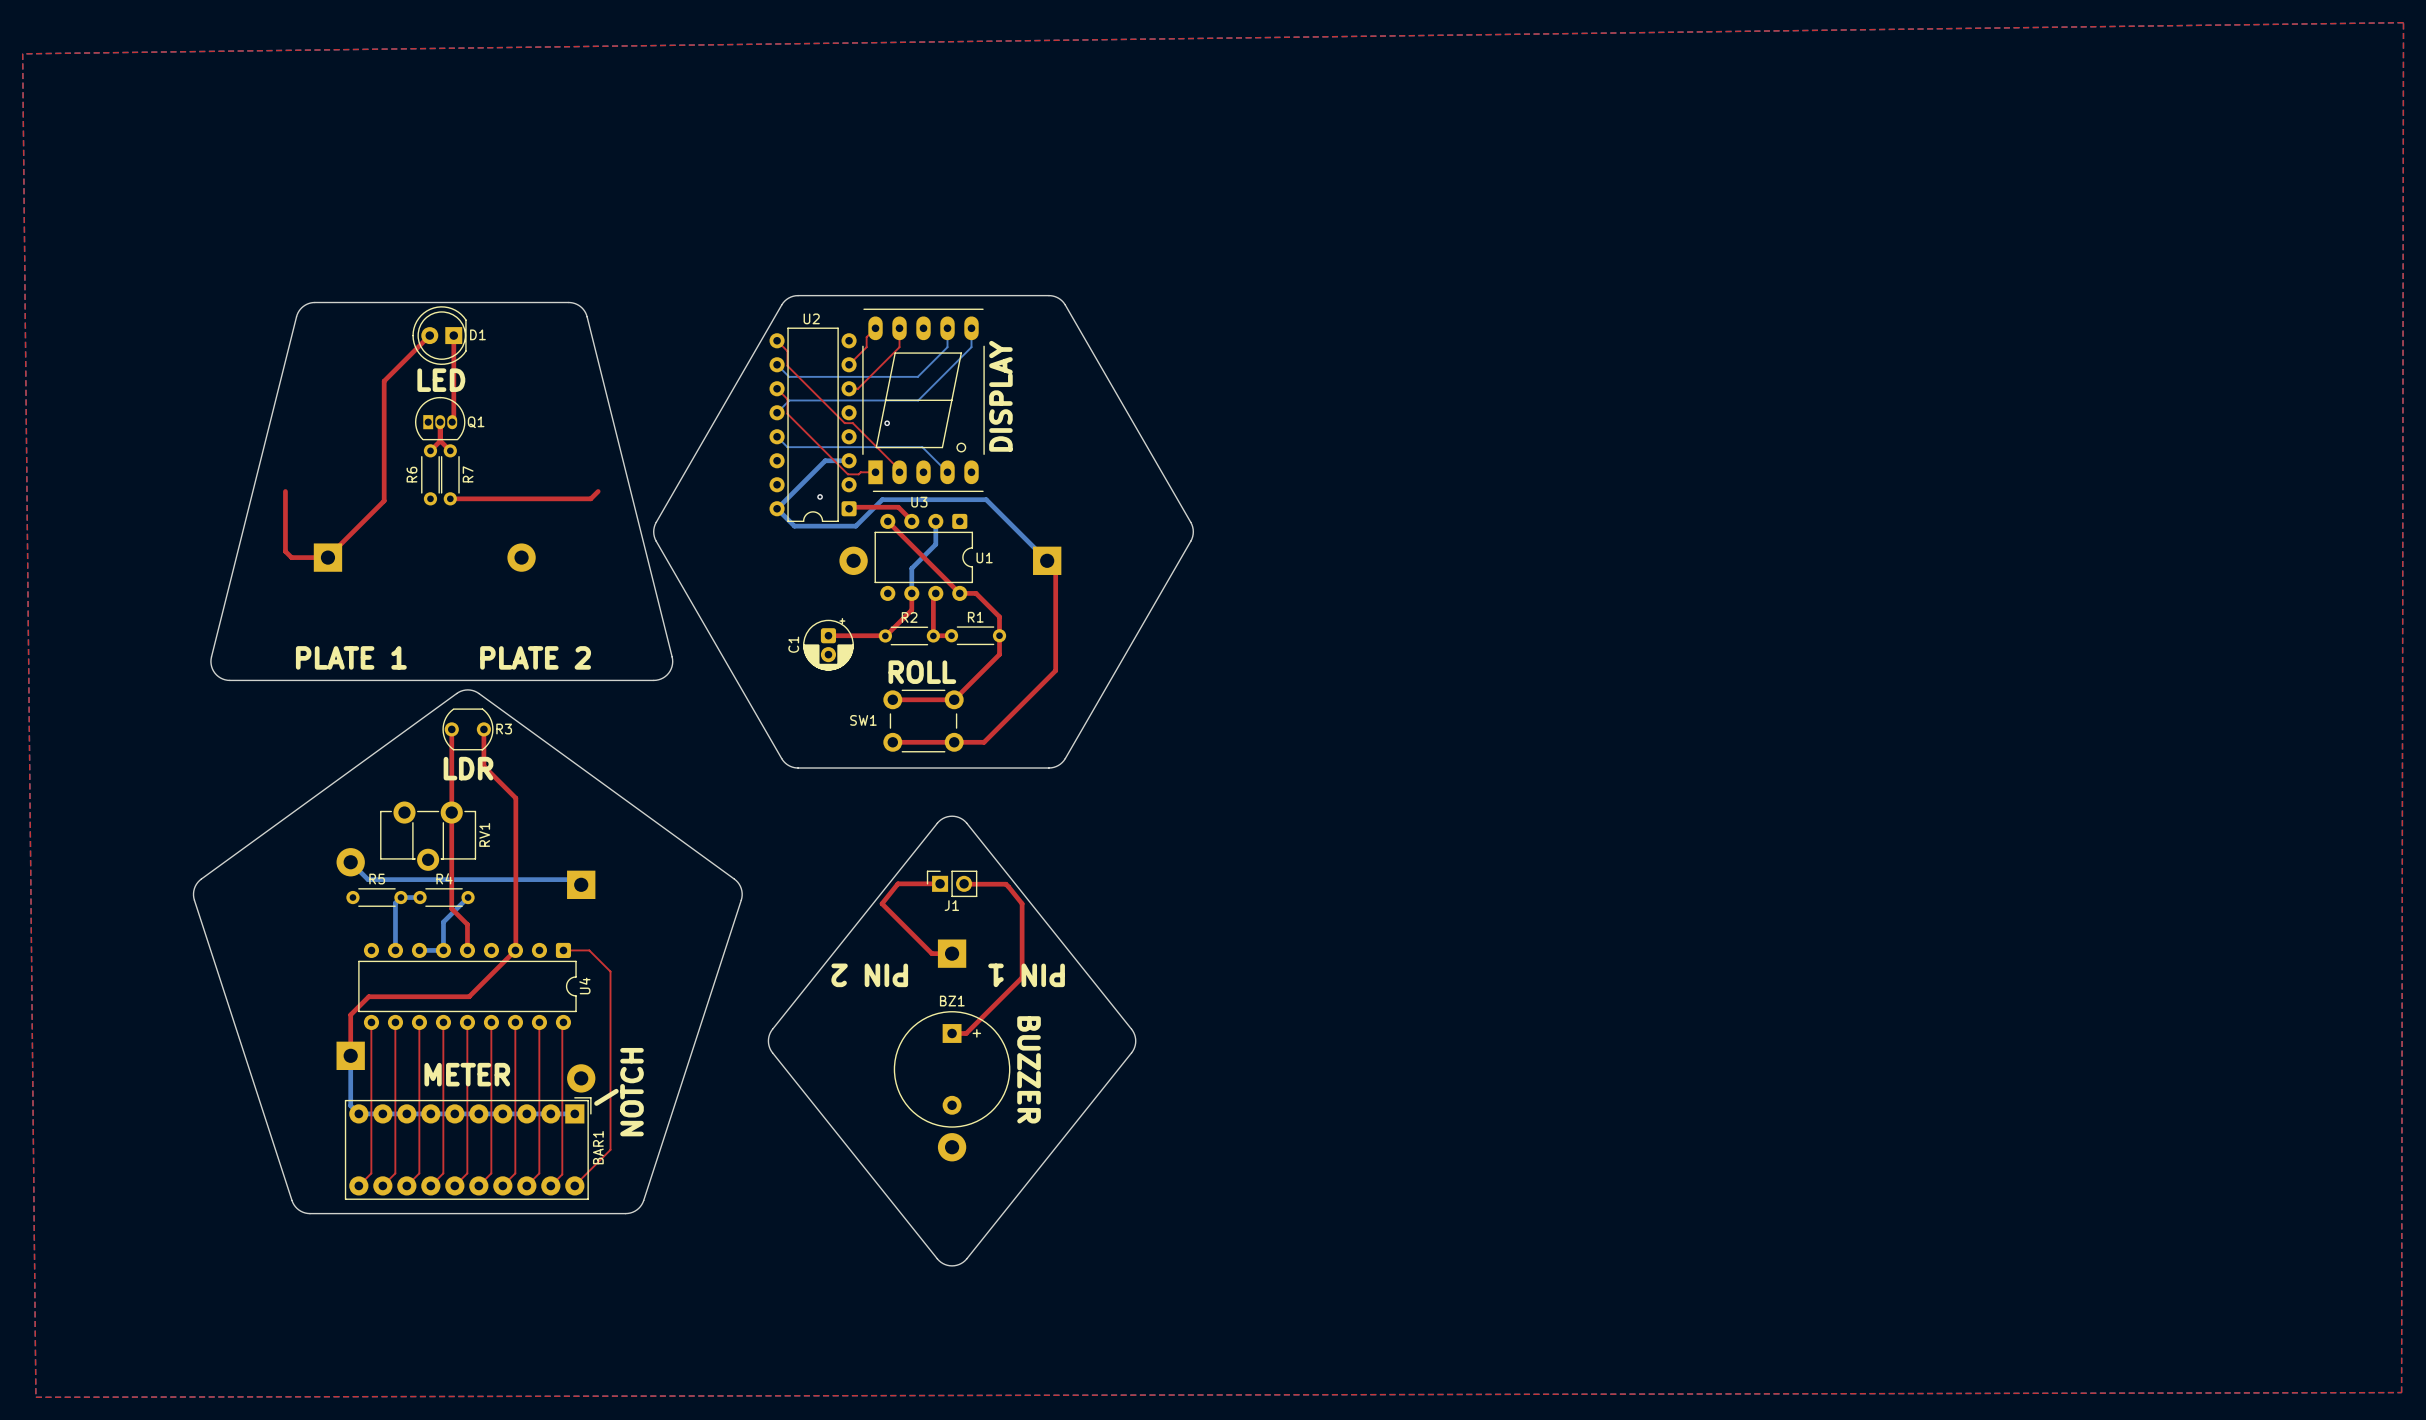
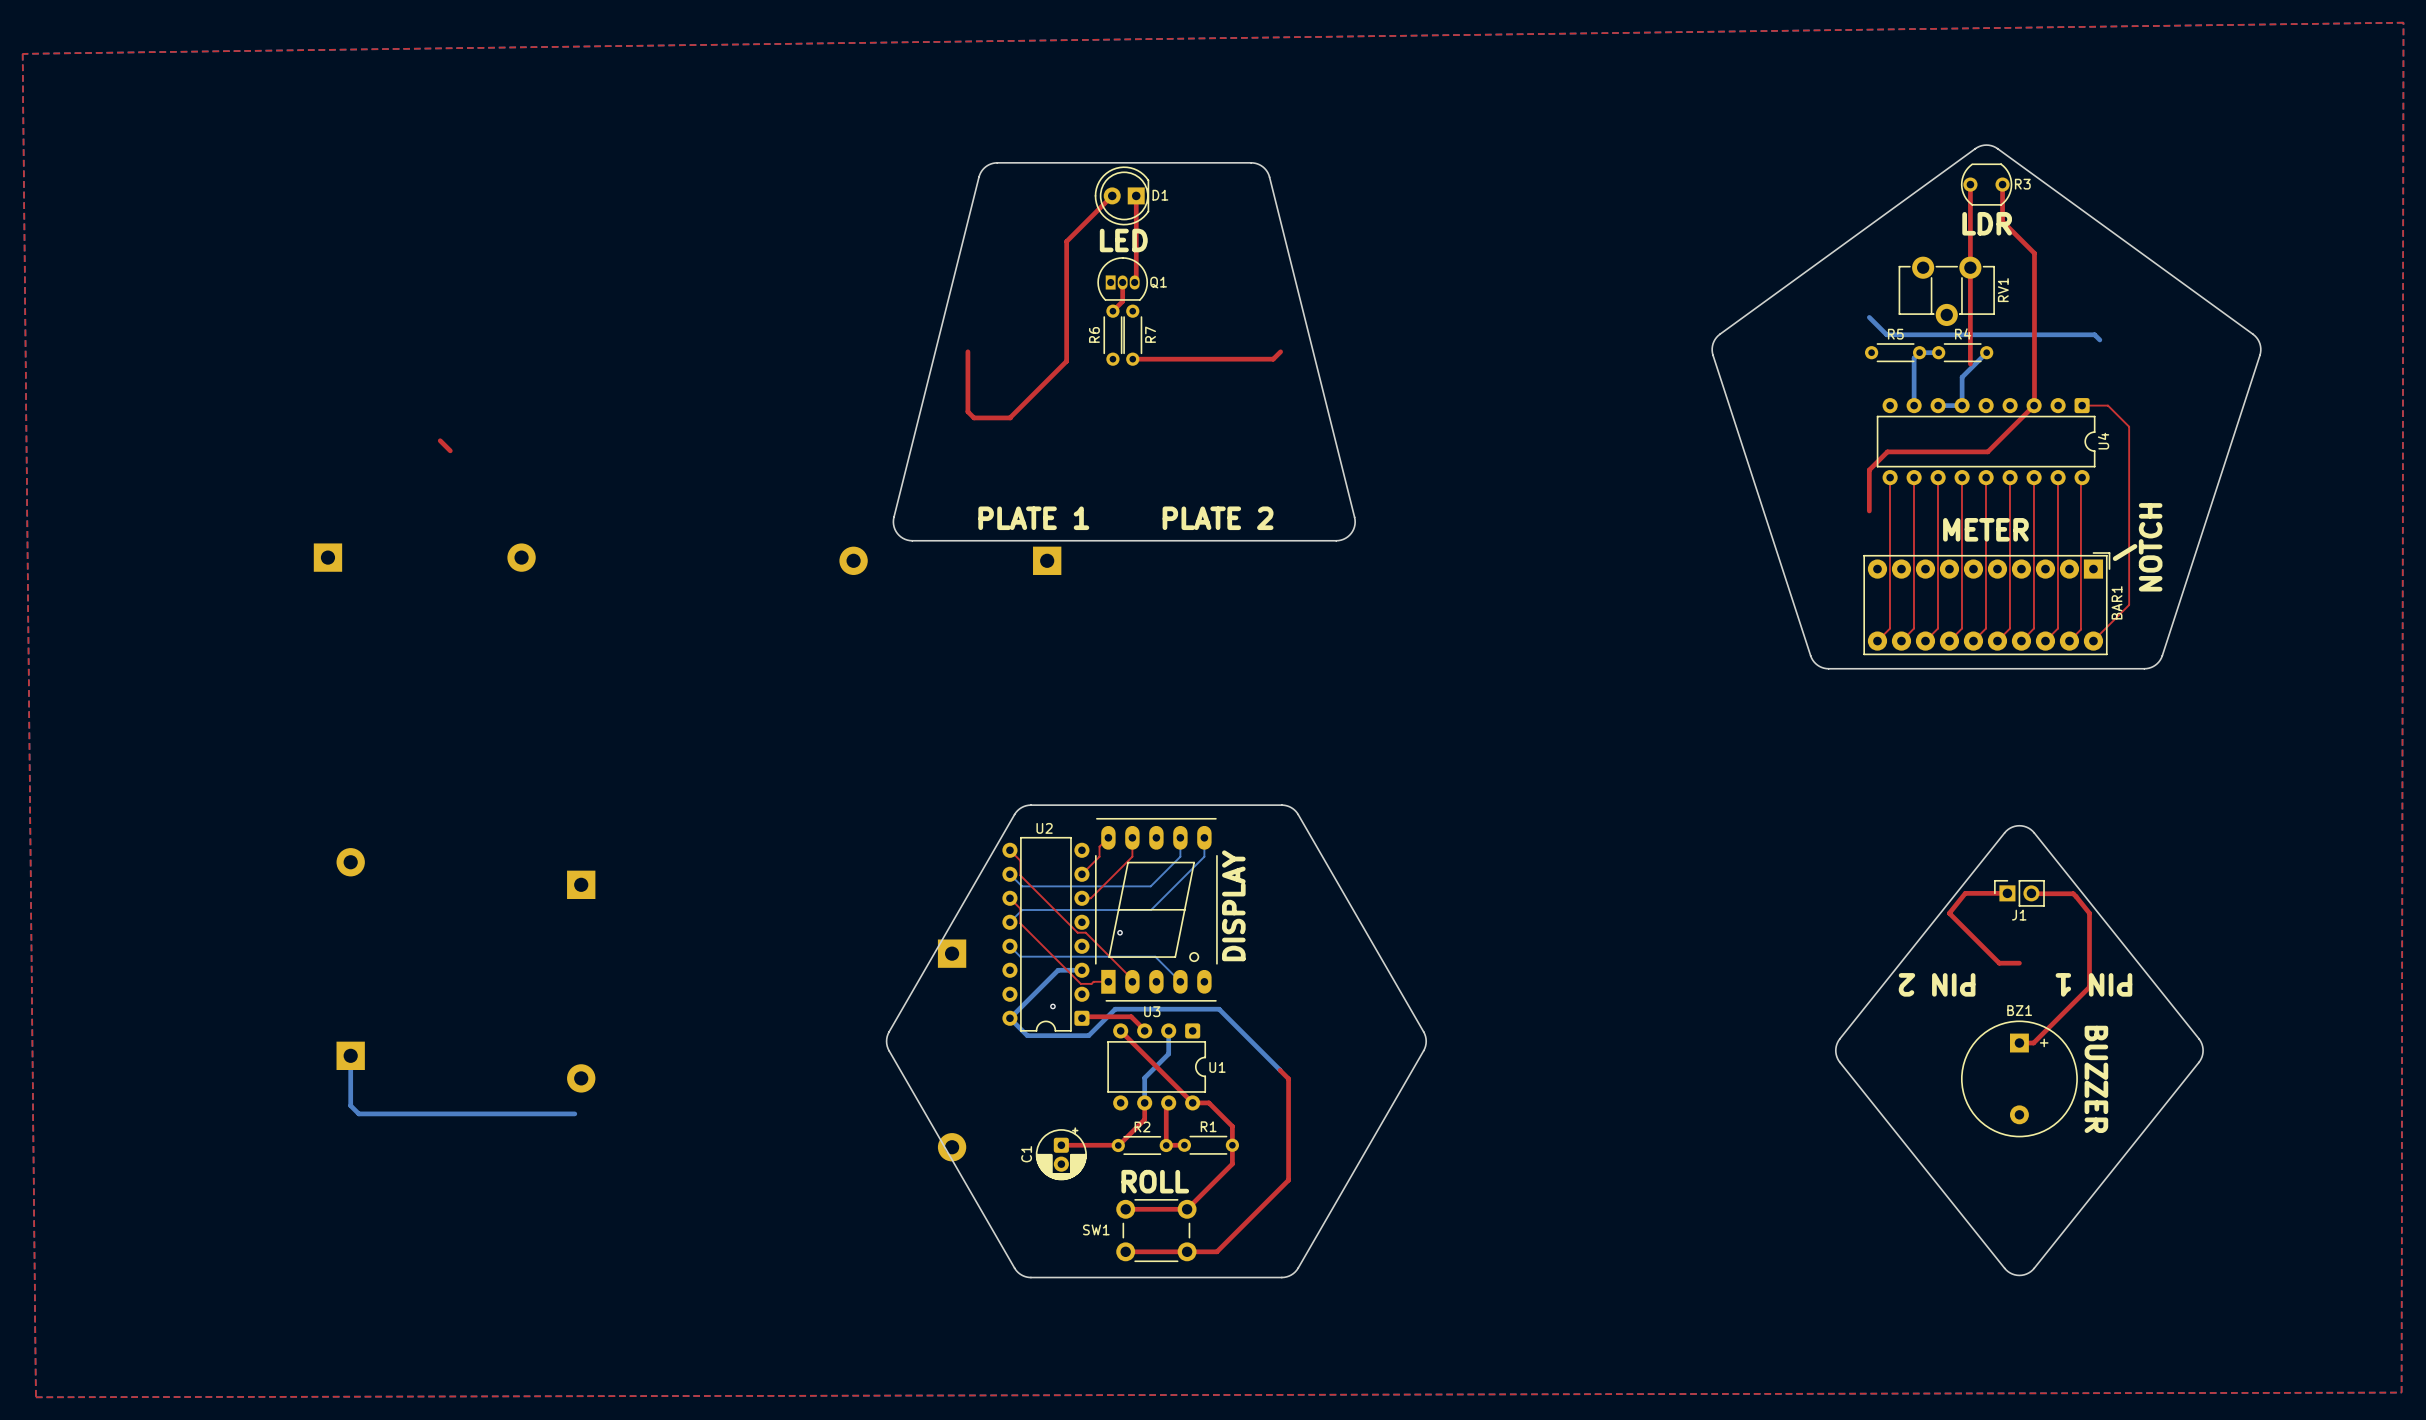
board edge: none -> (1975, 148) (1719, 334) (1713, 343) (1713, 355) (1810, 655) (1817, 665) (1828, 668) (2151, 667) (2158, 661) (2162, 655) (2259, 355) (2259, 343) (2253, 334) (1997, 148) (1986, 145) (1975, 148)
board edge: none -> (997, 162) (1251, 162) (1264, 168) (1269, 177) (1354, 517) (1354, 526) (1349, 535) (1336, 540) (912, 540) (899, 535) (894, 526) (893, 517) (978, 177) (985, 166) (997, 162)
top track: none -> (1970, 184) (1970, 363)
top track: none -> (2002, 184) (2002, 221) (2034, 253) (2034, 405) (1987, 451) (1887, 451) (1869, 470) (1869, 510)
top track: none -> (1112, 195) (1066, 241) (1066, 361) (1010, 417) (974, 417) (967, 411) (967, 351)
top track: none -> (1136, 195) (1136, 280) (1134, 282)
text: none -> LDR (1987, 223)
text: none -> LED (1123, 240)
top track: none -> (1122, 282) (1122, 301) (1112, 311)
board edge: (798, 295) (1048, 295) (1058, 298) (1065, 305) (1190, 522) (1193, 531) (1190, 541) (1065, 758) (1058, 765) (1048, 768) (798, 768) (788, 765) (781, 758) (656, 541) (653, 531) (656, 522) (781, 305) (788, 298) (798, 295) -> none
board edge: (314, 302) (568, 302) (581, 307) (587, 316) (672, 656) (672, 666) (667, 674) (653, 680) (229, 680) (216, 674) (211, 666) (211, 656) (296, 316) (303, 306) (314, 302) -> none
D1 footprint: [412, 306, 467, 365] -> [1094, 166, 1149, 226]
bottom track: none -> (1869, 317) (1886, 334) (2094, 334) (2099, 339)
top track: (875, 328) (866, 337) (866, 347) (849, 364) -> none
top track: (899, 328) (899, 347) (857, 388) (849, 388) -> none
bottom track: (947, 328) (947, 347) (917, 376) (789, 376) (777, 364) -> none
bottom track: (971, 328) (971, 347) (918, 400) (789, 400) (777, 412) -> none
top track: (429, 335) (384, 381) (384, 500) (327, 557) (291, 557) (285, 551) (285, 491) -> none
top track: (453, 335) (453, 420) (452, 422) -> none
top track: (777, 340) (787, 351) (787, 365) (844, 423) (852, 423) (899, 469) (899, 472) -> none
top track: none -> (1280, 351) (1273, 359) (1132, 359)
bottom track: none -> (1938, 352) (1919, 352) (1914, 358) (1914, 405)
bottom track: none -> (1986, 352) (1962, 377) (1962, 405) (1938, 405)
text: LED (441, 380) -> none
top track: (777, 388) (787, 399) (787, 413) (847, 474) (875, 472) -> none
text: DISPLAY (1000, 396) -> none
U3 position: (923, 400) -> (1156, 909)
top track: none -> (2082, 405) (2107, 405) (2129, 426) (2129, 604) (2093, 641)
Q1 position: (440, 418) -> (1122, 278)
top track: (440, 422) (440, 441) (430, 450) -> none
via: (887, 423) -> none
U2 position: (813, 424) -> (1045, 934)
bottom track: (777, 436) (787, 447) (922, 447) (947, 472) -> none
bottom track: (849, 460) (825, 460) (777, 508) -> none
R6 position: (430, 474) -> (1112, 335)
R7 position: (450, 474) -> (1132, 335)
top track: none -> (1889, 477) (1889, 628) (1877, 641)
top track: none -> (1913, 477) (1913, 628) (1901, 641)
top track: none -> (1937, 477) (1937, 628) (1925, 641)
top track: none -> (1961, 477) (1961, 628) (1949, 641)
top track: none -> (1985, 477) (1985, 628) (1973, 641)
top track: none -> (2009, 477) (2009, 628) (1997, 641)
top track: none -> (2033, 477) (2033, 628) (2021, 641)
top track: none -> (2057, 477) (2057, 628) (2045, 641)
top track: none -> (2082, 477) (2080, 629) (2069, 641)
top track: (598, 491) (590, 498) (450, 498) -> none
via: (820, 496) -> none
bottom track: (777, 508) (794, 526) (855, 526) (882, 499) (986, 499) (1047, 560) -> none
top track: (849, 508) (898, 507) (911, 521) -> none
text: none -> PLATE 1 (1033, 518)
text: none -> PLATE 2 (1218, 518)
top track: (887, 521) (959, 593) (976, 593) (999, 616) (999, 654) (954, 699) (892, 699) -> none
bottom track: (935, 521) (935, 544) (911, 568) (911, 593) -> none
text: none -> METER (1985, 529)
line: none -> (2135, 546) (2115, 558)
text: none -> NOTCH (2150, 547)
U1 position: (923, 557) -> (1156, 1066)
top track: (1047, 560) (1055, 569) (1055, 670) (984, 742) (892, 742) -> none
top track: (911, 593) (911, 610) (886, 635) (828, 635) -> none
top track: (935, 593) (933, 595) (933, 635) (951, 635) -> none
R2 position: (909, 635) -> (1142, 1145)
R1 position: (975, 635) -> (1208, 1145)
C1 position: (828, 644) -> (1061, 1153)
text: PLATE 1 (351, 657) -> none
text: PLATE 2 (535, 657) -> none
text: ROLL (922, 672) -> none
board edge: (456, 693) (201, 879) (194, 888) (194, 900) (292, 1200) (298, 1209) (309, 1213) (632, 1212) (638, 1208) (643, 1200) (741, 900) (741, 888) (734, 879) (478, 693) (467, 689) (456, 693) -> none
SW1 position: (923, 721) -> (1156, 1230)
top track: (451, 729) (451, 908) (467, 924) (467, 950) -> none
R3 position: (467, 729) -> (1986, 184)
top track: (483, 729) (483, 766) (515, 798) (515, 950) (469, 996) (368, 996) (350, 1014) (350, 1055) -> none
text: LDR (468, 768) -> none
board edge: none -> (1030, 805) (1281, 805) (1291, 807) (1298, 814) (1423, 1031) (1426, 1041) (1423, 1050) (1298, 1268) (1291, 1274) (1281, 1277) (1030, 1277) (1021, 1274) (1014, 1268) (889, 1050) (886, 1041) (889, 1031) (1014, 814) (1021, 807) (1030, 805)
board edge: (937, 823) (772, 1029) (768, 1041) (772, 1052) (937, 1258) (942, 1263) (952, 1265) (961, 1263) (966, 1258) (1131, 1052) (1135, 1041) (1131, 1029) (965, 821) (959, 817) (949, 816) (937, 823) -> none
board edge: none -> (2004, 832) (1839, 1038) (1835, 1050) (1839, 1062) (2004, 1268) (2010, 1273) (2019, 1275) (2026, 1274) (2034, 1268) (2198, 1062) (2203, 1050) (2198, 1038) (2032, 831) (2026, 827) (2017, 825) (2004, 832)
RV1 position: (428, 836) -> (1946, 291)
top track: none -> (1108, 837) (1099, 846) (1099, 856) (1081, 874)
top track: none -> (1132, 837) (1132, 856) (1090, 898) (1081, 898)
bottom track: none -> (1180, 837) (1180, 856) (1150, 886) (1022, 886) (1009, 874)
bottom track: none -> (1204, 837) (1204, 856) (1151, 910) (1022, 910) (1009, 922)
top track: none -> (1009, 850) (1020, 860) (1020, 875) (1077, 932) (1085, 932) (1132, 979) (1132, 981)
bottom track: (350, 862) (368, 879) (576, 879) (581, 884) -> none
top track: (940, 883) (897, 883) (882, 903) (931, 953) (952, 953) -> none
J1 position: (952, 883) -> (2019, 893)
top track: (964, 883) (1005, 884) (1022, 903) (1022, 977) (966, 1033) (952, 1033) -> none
top track: none -> (2007, 893) (1965, 893) (1949, 913) (1999, 963) (2019, 963)
top track: none -> (2031, 893) (2073, 893) (2089, 913) (2089, 987) (2033, 1043) (2019, 1043)
R5 position: (376, 897) -> (1895, 352)
bottom track: (420, 897) (400, 897) (395, 903) (395, 950) -> none
R4 position: (444, 897) -> (1962, 352)
bottom track: (468, 897) (443, 922) (443, 950) (419, 950) -> none
top track: none -> (1009, 898) (1020, 908) (1020, 923) (1080, 983) (1108, 981)
text: none -> DISPLAY (1233, 905)
via: none -> (1120, 932)
bottom track: none -> (1009, 946) (1020, 956) (1155, 956) (1180, 981)
top track: (563, 950) (589, 950) (610, 971) (610, 1149) (574, 1185) -> none
bottom track: none -> (1081, 970) (1058, 970) (1010, 1018)
text: PIN 2 (869, 975) -> none
text: PIN 1 (1026, 975) -> none
text: none -> PIN 2 (1937, 984)
text: none -> PIN 1 (2093, 984)
U4 position: (467, 986) -> (1986, 441)
via: none -> (1052, 1006)
bottom track: none -> (1009, 1018) (1027, 1035) (1088, 1035) (1115, 1009) (1219, 1009) (1280, 1070)
top track: none -> (1081, 1018) (1131, 1016) (1144, 1030)
top track: (371, 1022) (371, 1173) (358, 1185) -> none
top track: (395, 1022) (395, 1173) (382, 1185) -> none
top track: (419, 1022) (419, 1173) (406, 1185) -> none
top track: (443, 1022) (443, 1173) (430, 1185) -> none
top track: (467, 1022) (467, 1173) (454, 1185) -> none
top track: (491, 1022) (491, 1173) (478, 1185) -> none
top track: (515, 1022) (515, 1173) (502, 1185) -> none
top track: (539, 1022) (539, 1173) (526, 1185) -> none
top track: (563, 1022) (562, 1174) (550, 1185) -> none
top track: none -> (1120, 1030) (1192, 1102) (1208, 1102) (1232, 1126) (1232, 1164) (1187, 1209) (1125, 1209)
bottom track: none -> (1168, 1030) (1168, 1053) (1144, 1077) (1144, 1102)
BZ1 position: (952, 1069) -> (2019, 1078)
text: BUZZER (1029, 1069) -> none
top track: none -> (1280, 1070) (1288, 1078) (1288, 1180) (1216, 1251) (1125, 1251)
text: METER (467, 1074) -> none
text: none -> BUZZER (2096, 1079)
line: (616, 1091) (596, 1103) -> none
text: NOTCH (632, 1092) -> none
top track: none -> (1144, 1102) (1144, 1119) (1118, 1145) (1061, 1145)
top track: none -> (1168, 1102) (1166, 1105) (1166, 1145) (1184, 1145)
BAR1 position: (468, 1148) -> (1986, 603)
text: none -> ROLL (1155, 1181)

